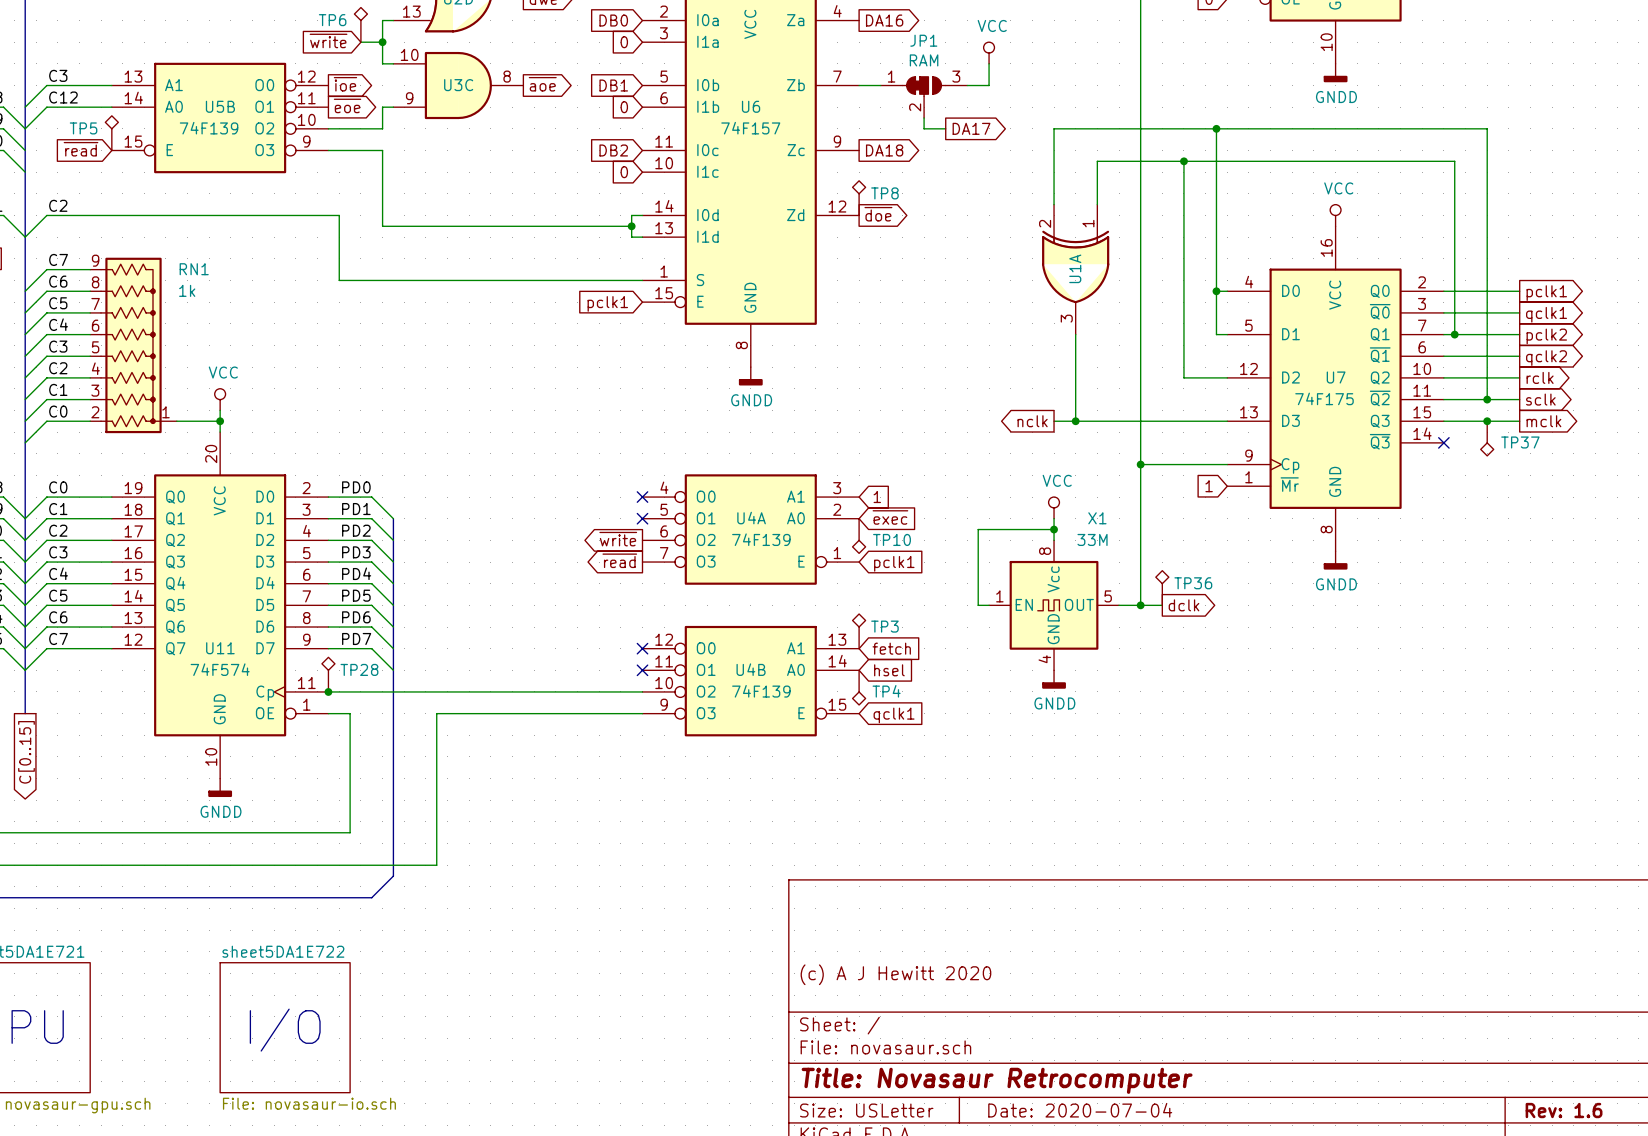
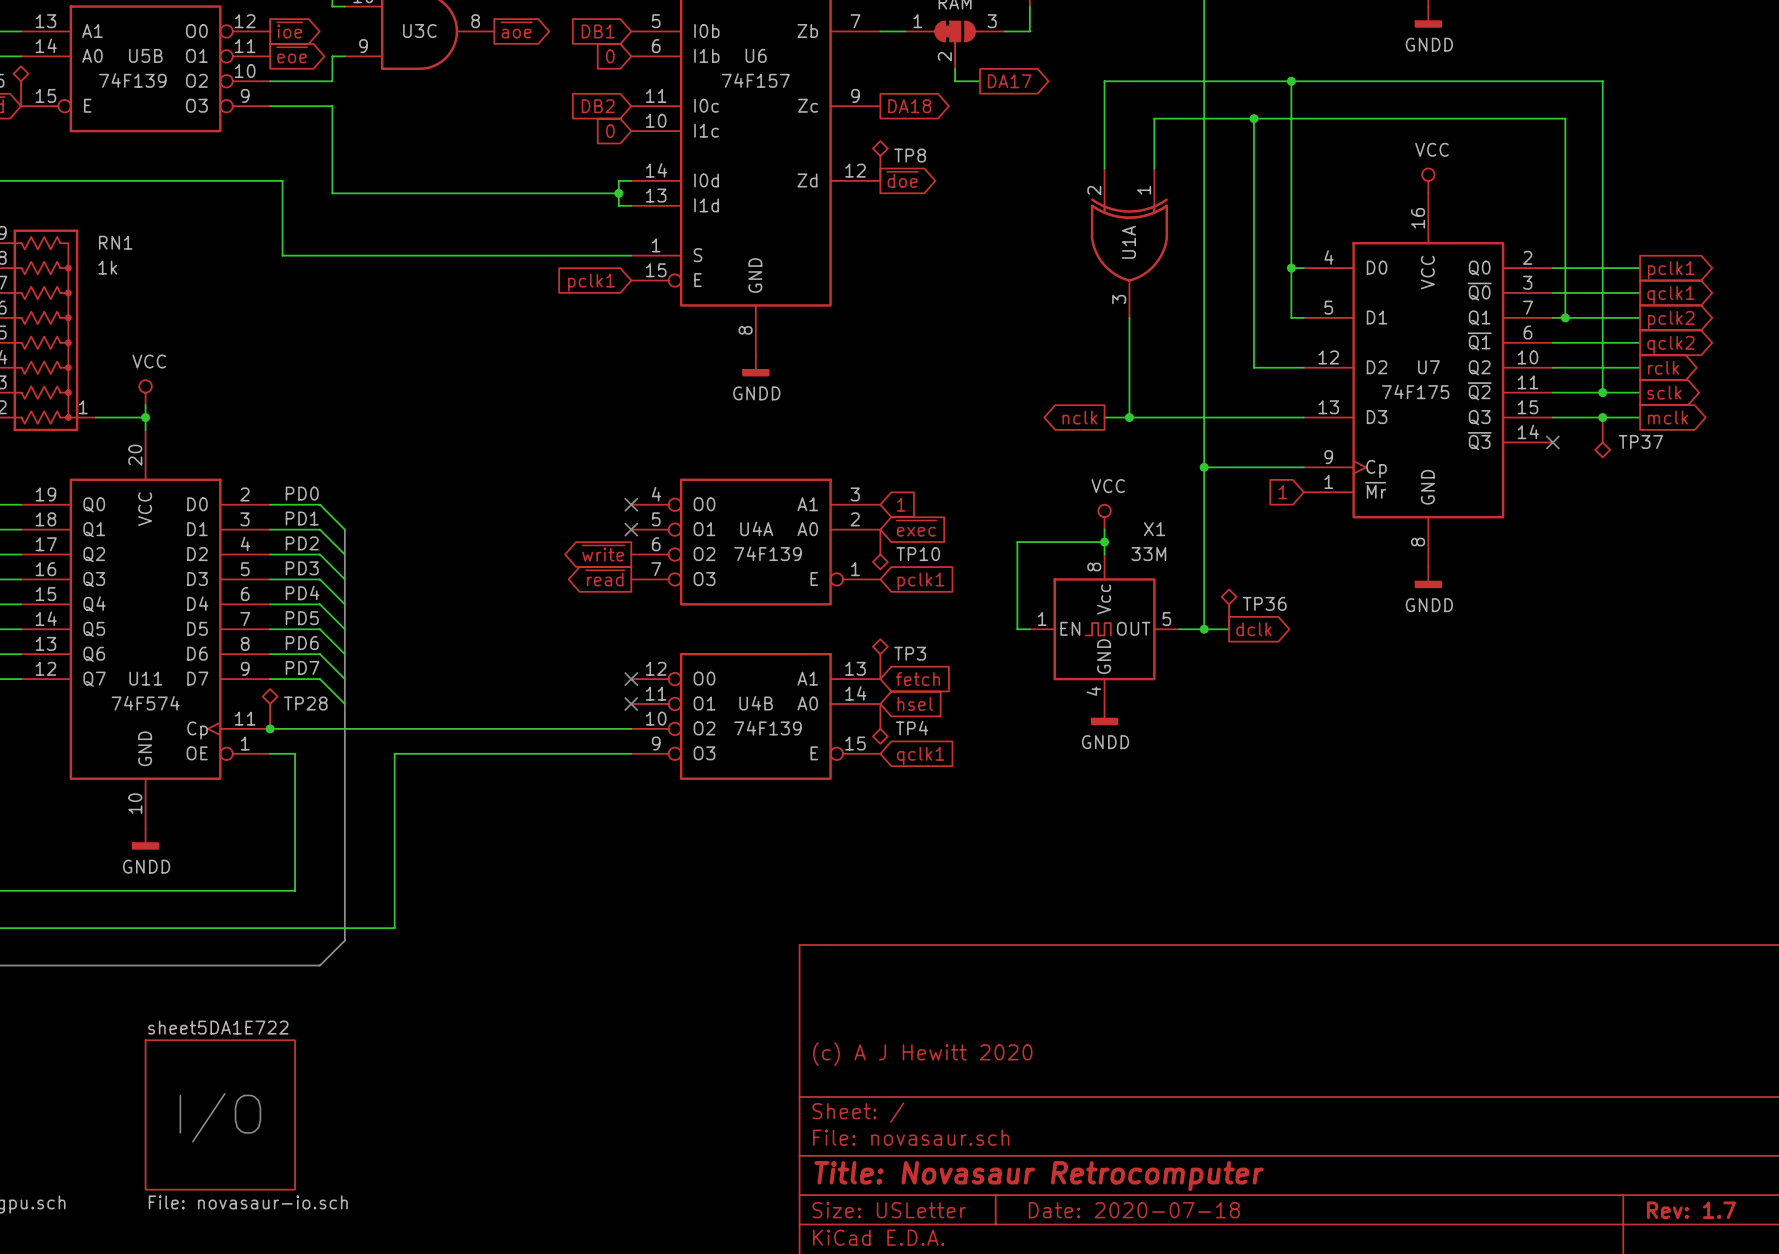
title block: Date: 2020-07-04 (1080, 1110) -> Date: 2020-07-18 (1134, 1210)
title block: Rev: 1.6 (1564, 1110) -> Rev: 1.7 (1691, 1210)

